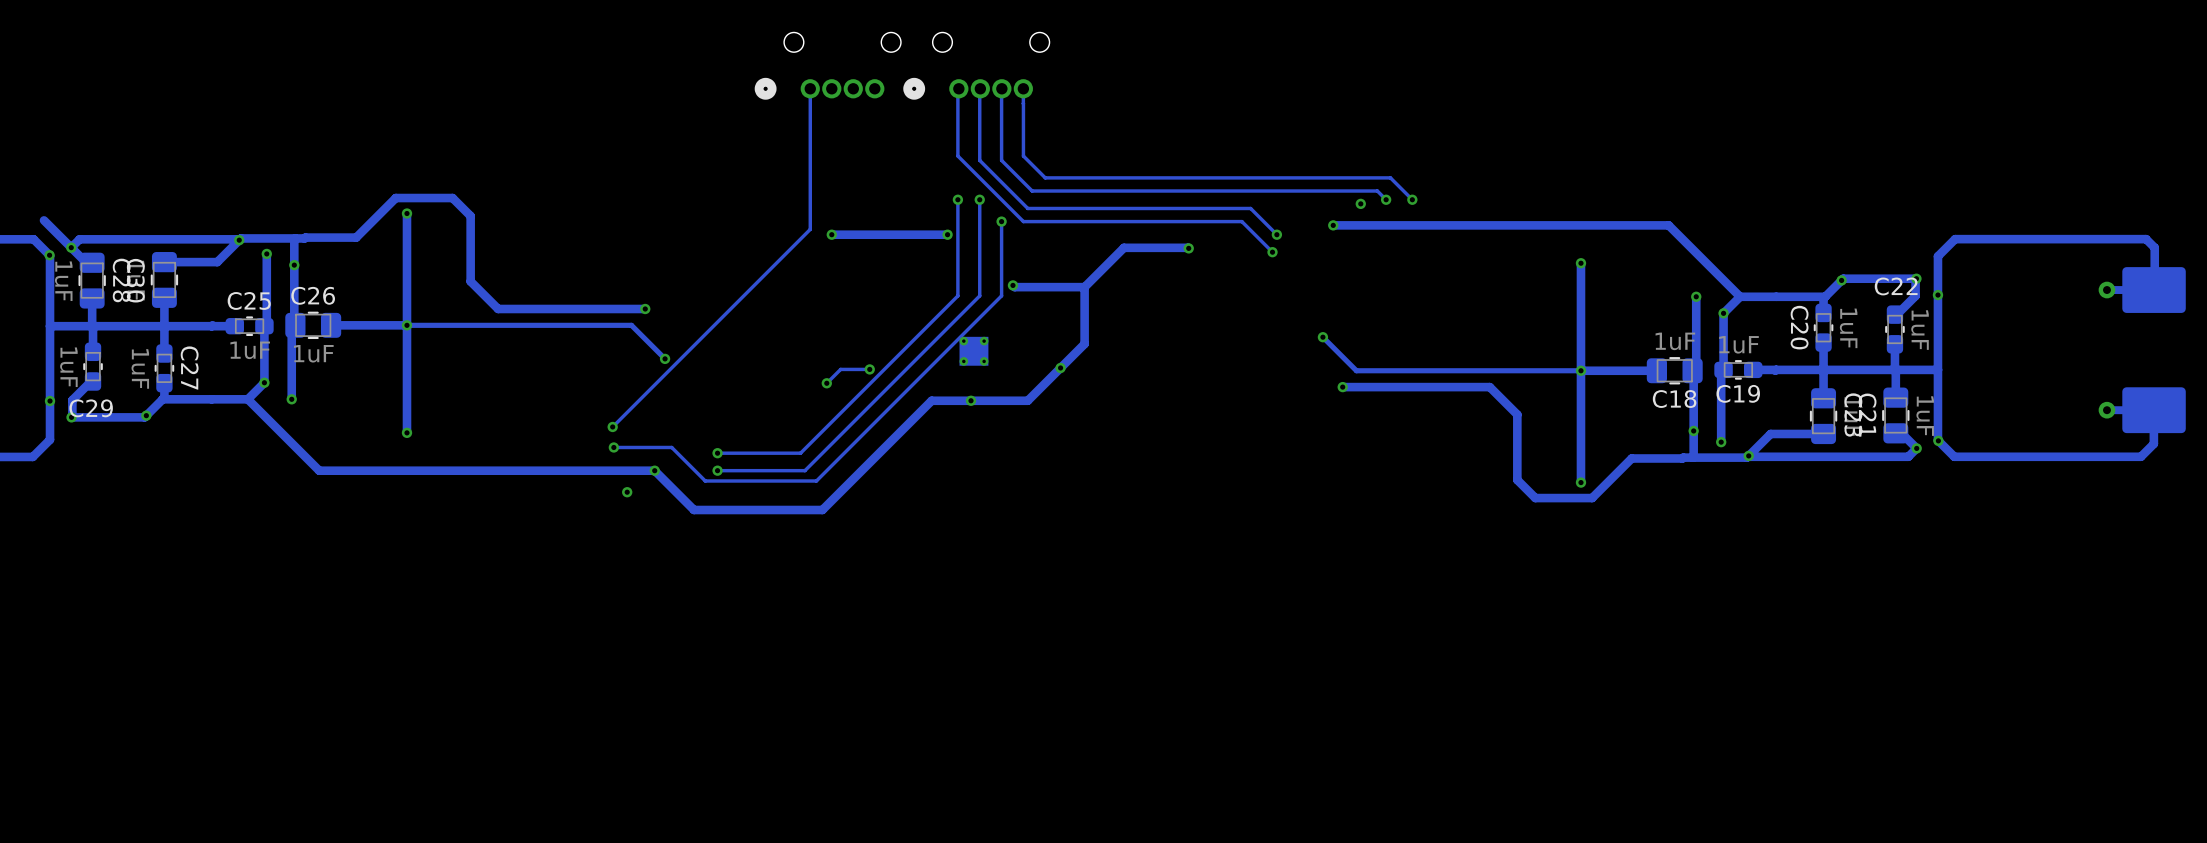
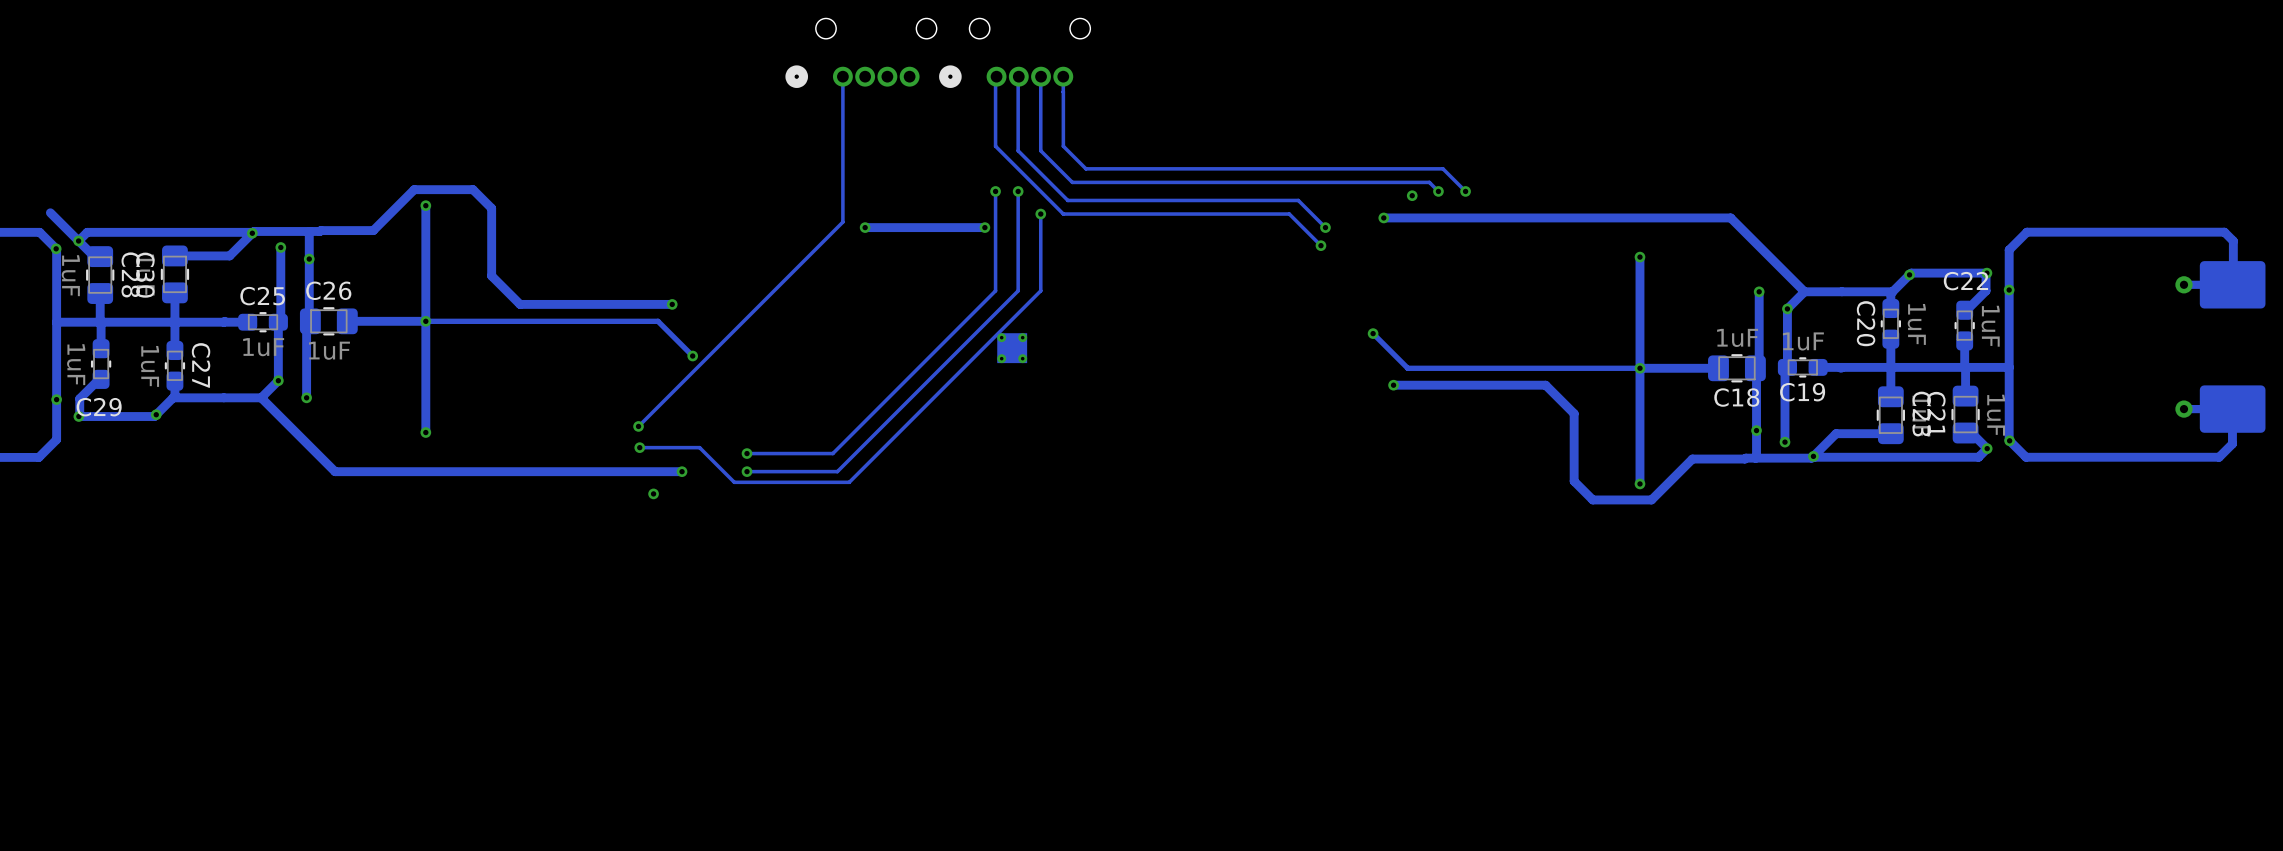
track: (1188, 248) (1123, 247) (1084, 287) -> none
via: (1188, 248) -> none
track: (1012, 285) (1014, 287) (1084, 287) -> none
via: (1012, 285) -> none
track: (1084, 287) (1084, 343) (1027, 400) (931, 400) (822, 510) (694, 510) (654, 470) -> none
via: (1060, 367) -> none
track: (869, 369) (840, 369) (826, 383) -> none
via: (869, 369) -> none
via: (826, 383) -> none
via: (971, 400) -> none

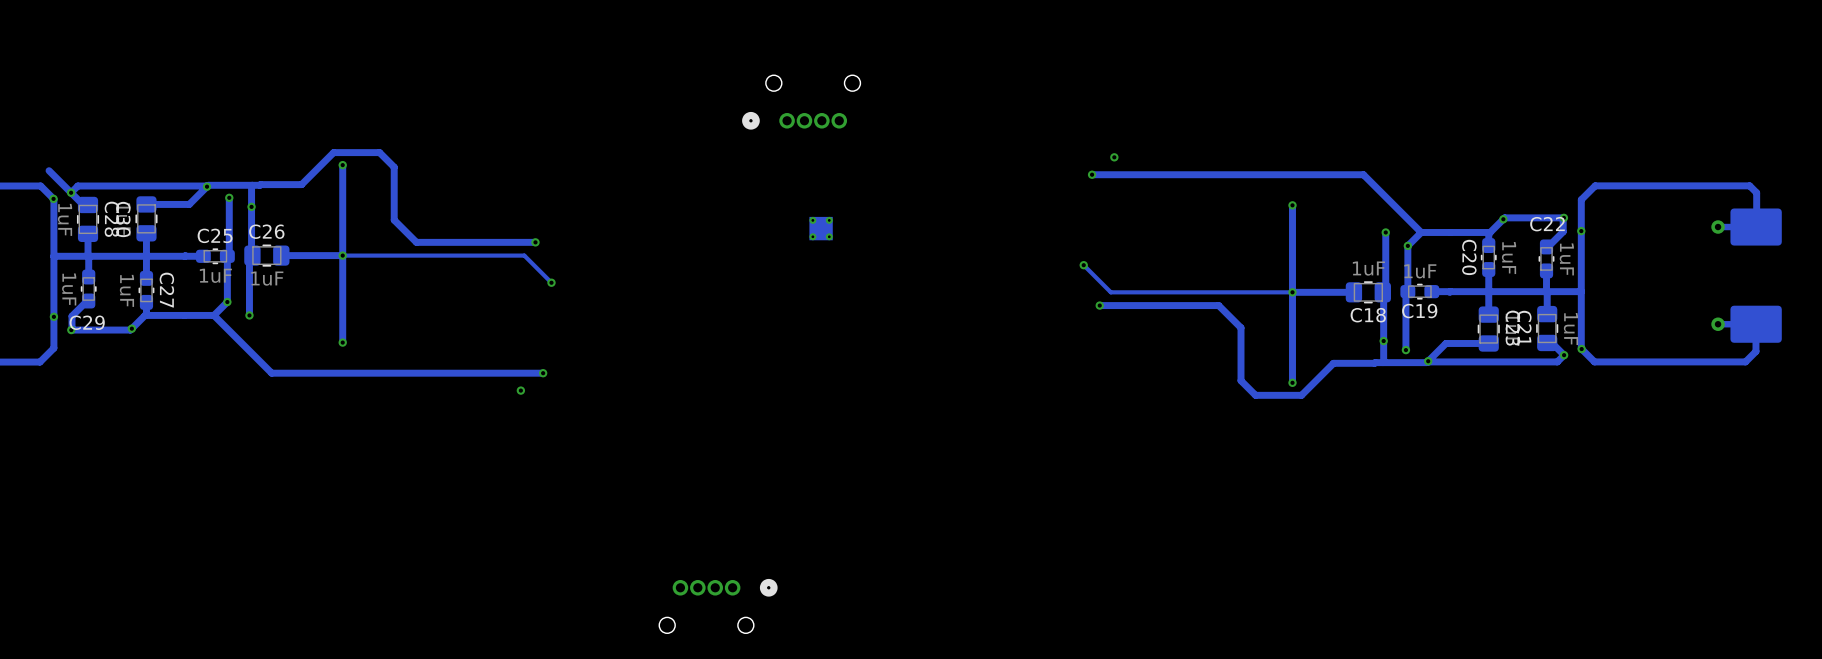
part: (861, 53) -> none
part position: (1014, 53) -> (801, 102)
track: (842, 76) (842, 222) (638, 426) -> none
track: (996, 76) (995, 146) (1063, 214) (1289, 214) (1320, 245) -> none
track: (1018, 76) (1018, 150) (1067, 200) (1298, 200) (1325, 227) -> none
track: (1041, 76) (1040, 150) (1072, 182) (1429, 182) (1438, 191) -> none
track: (1063, 76) (1063, 146) (1085, 168) (1442, 168) (1465, 191) -> none
track: (995, 191) (995, 290) (832, 453) (747, 453) -> none
via: (995, 191) -> none
track: (1018, 191) (1018, 290) (837, 471) (747, 471) -> none
via: (1018, 191) -> none
via: (1438, 191) -> none
via: (1465, 191) -> none
track: (1040, 214) (1040, 290) (849, 482) (734, 482) (699, 447) (639, 447) -> none
via: (1040, 214) -> none
via: (865, 227) -> none
track: (984, 227) (865, 227) -> none
via: (984, 227) -> none
via: (1325, 227) -> none
via: (1320, 245) -> none
part position: (1012, 348) -> (821, 228)
via: (638, 426) -> none
via: (639, 447) -> none
via: (747, 453) -> none
via: (747, 471) -> none
part: none -> (718, 606)

